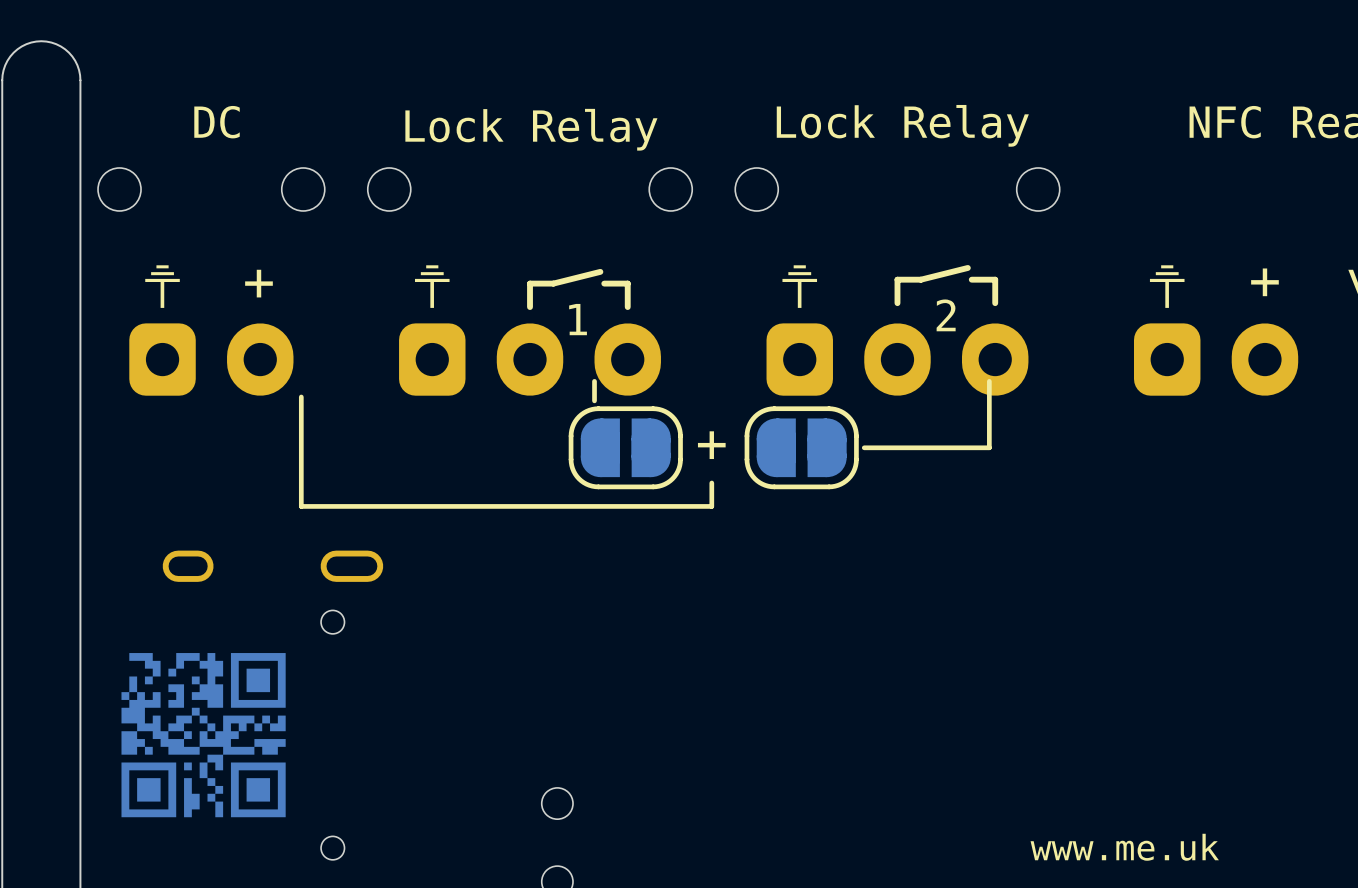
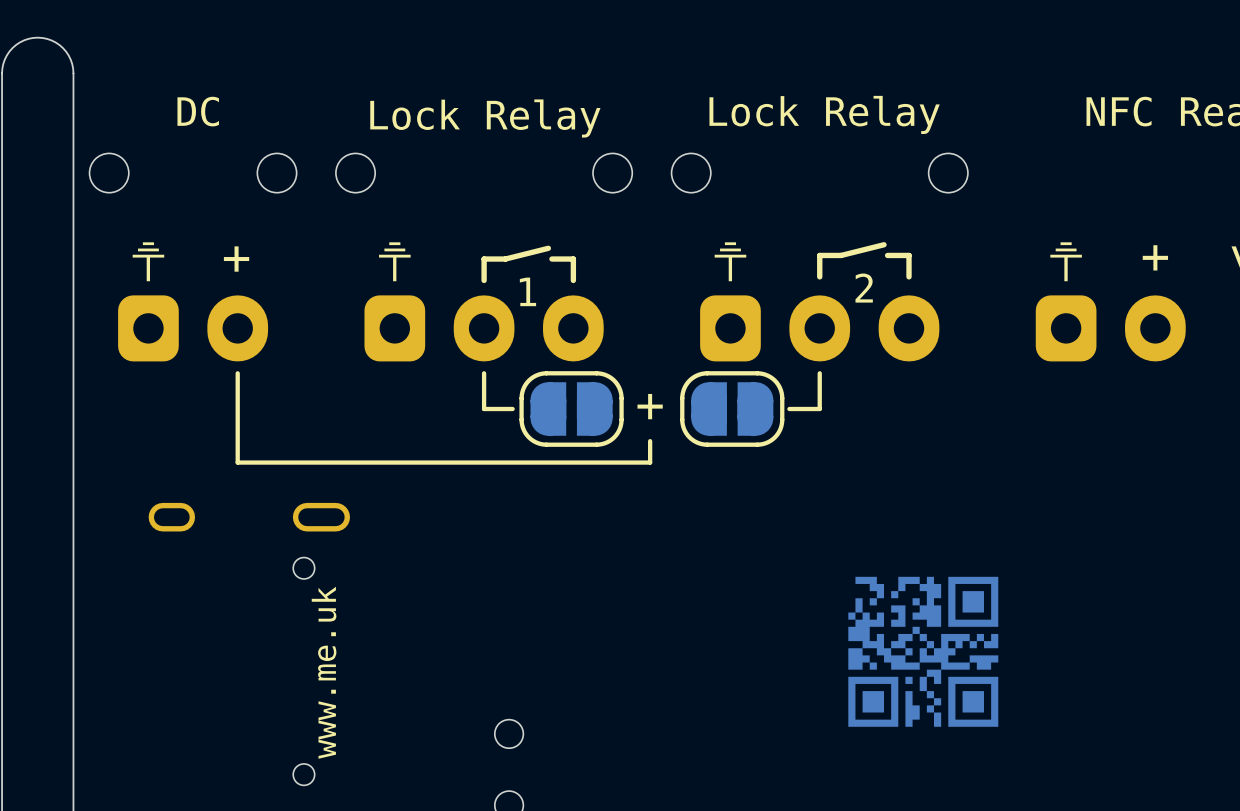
line: (594, 381) (594, 400) -> none
line: (989, 381) (989, 447) (897, 447) -> (819, 373) (819, 409)
line: (301, 396) (301, 506) -> (237, 373) (237, 462) (275, 462)
line: none -> (484, 373) (484, 409) (512, 409)
part position: (203, 735) -> (923, 651)
drawing position: (1124, 847) -> (324, 672)

